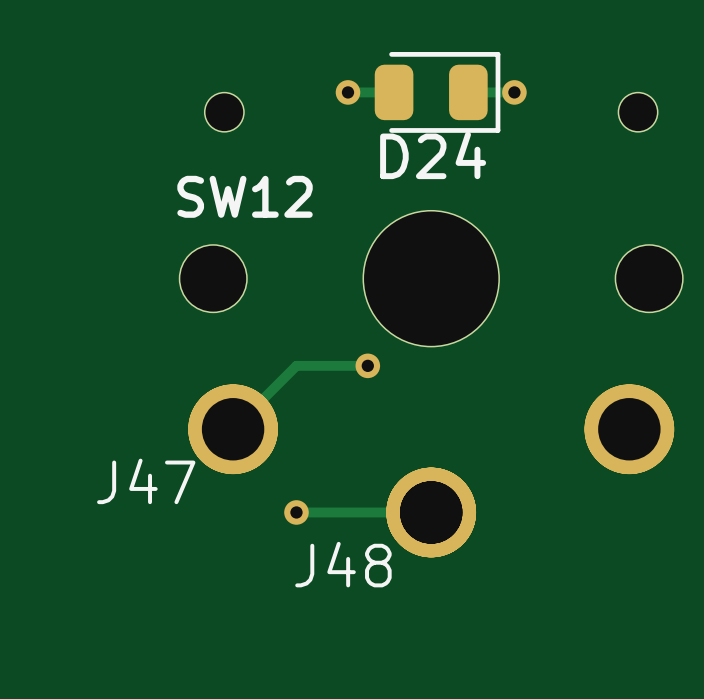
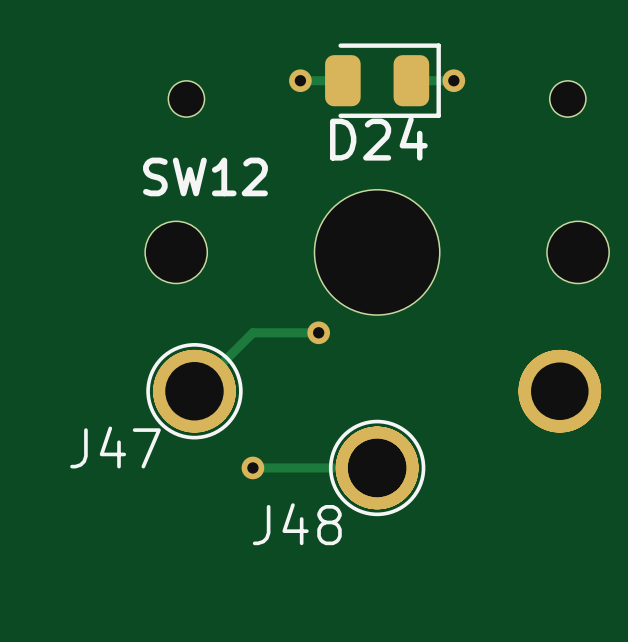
J47 footprint: [188, 384, 278, 475] -> [146, 343, 243, 440]
J48 footprint: [386, 467, 477, 558] -> [328, 419, 426, 517]

